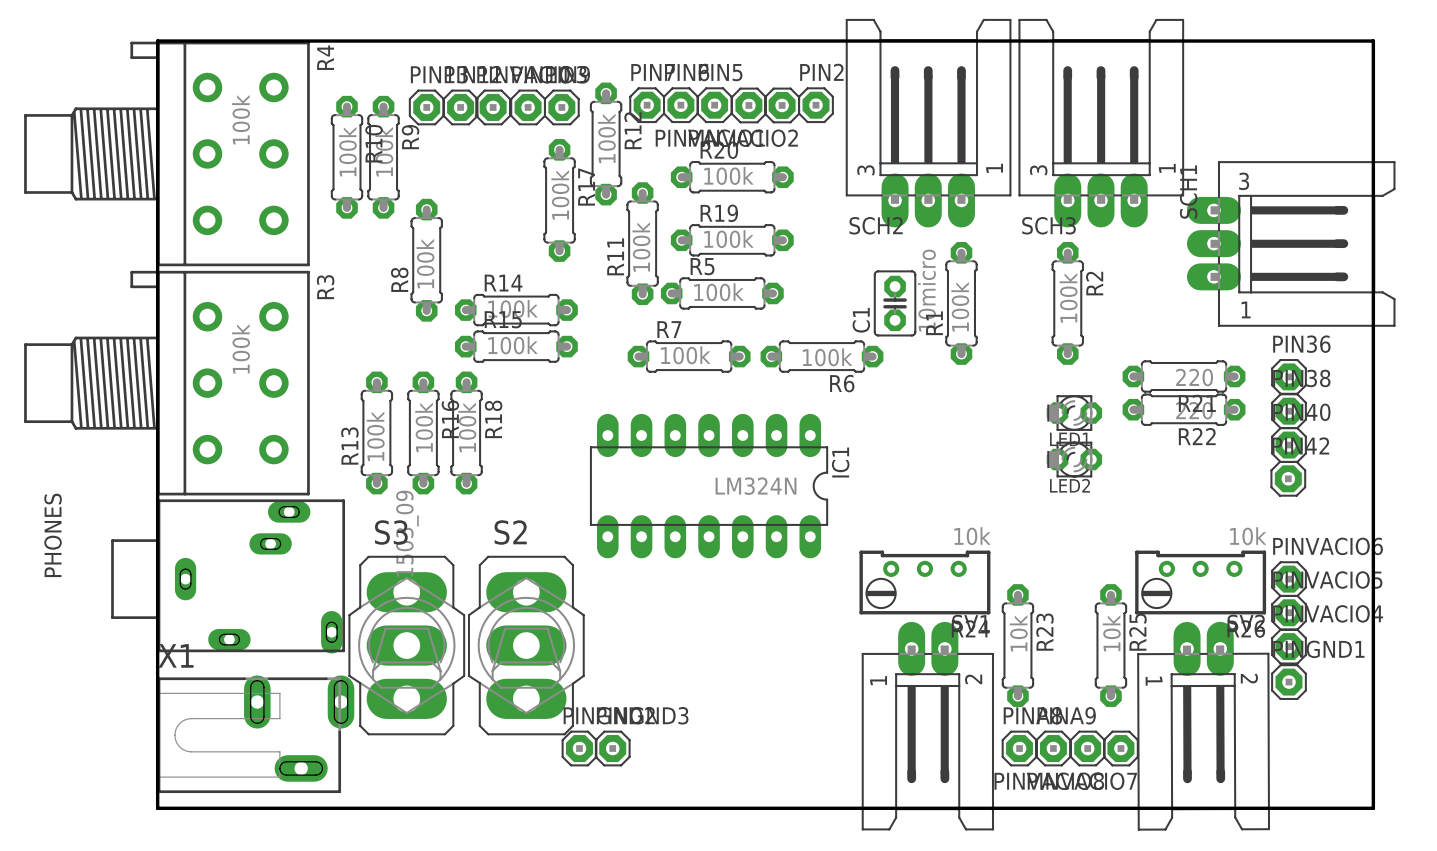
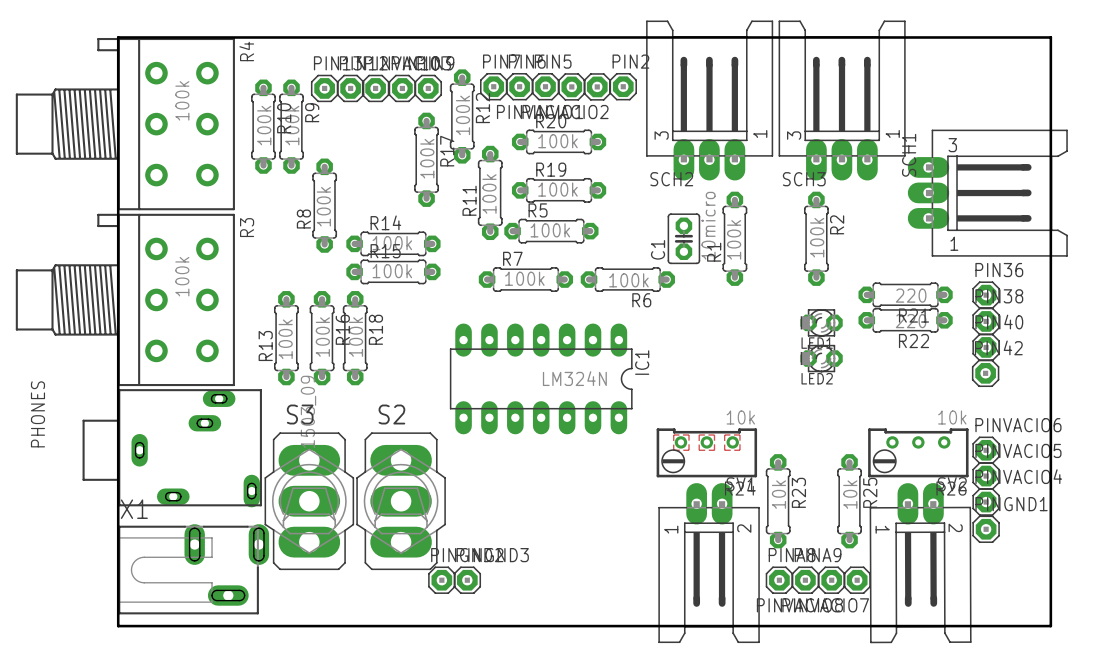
zone outline: none -> (673, 434) (673, 450) (689, 450) (689, 434) (673, 434)
zone outline: none -> (699, 434) (714, 434) (714, 450) (699, 450) (699, 434)
zone outline: none -> (724, 434) (739, 434) (739, 450) (724, 450) (724, 434)

